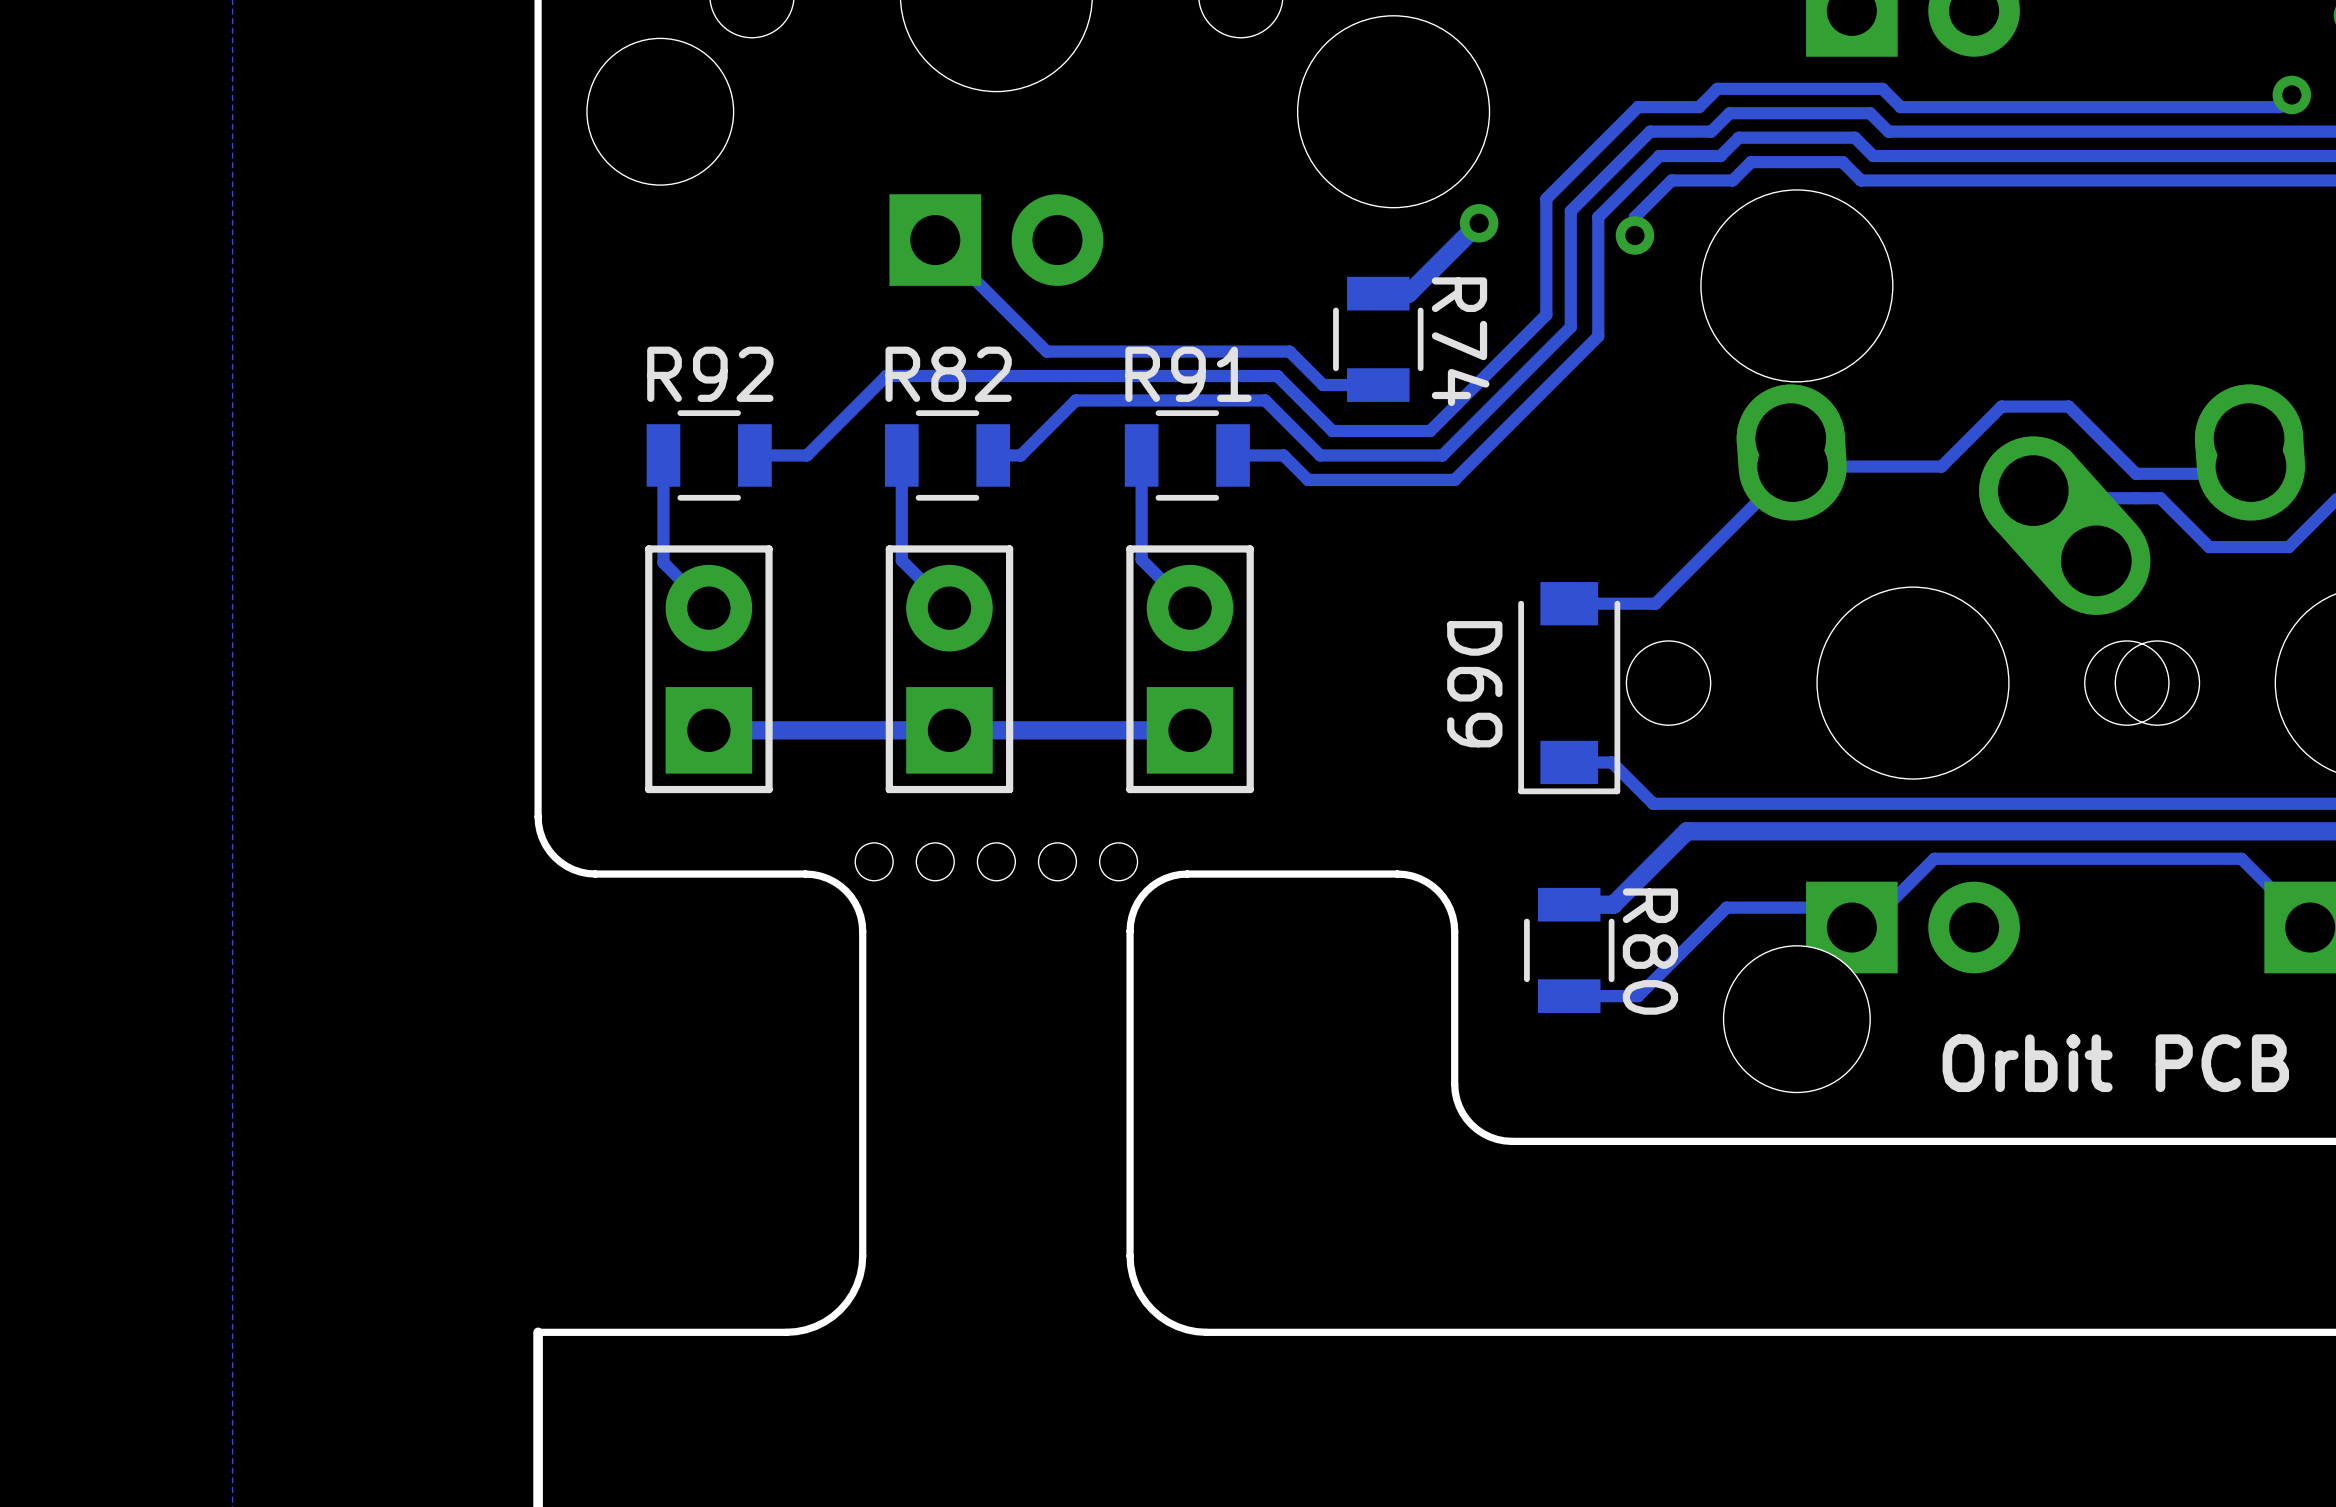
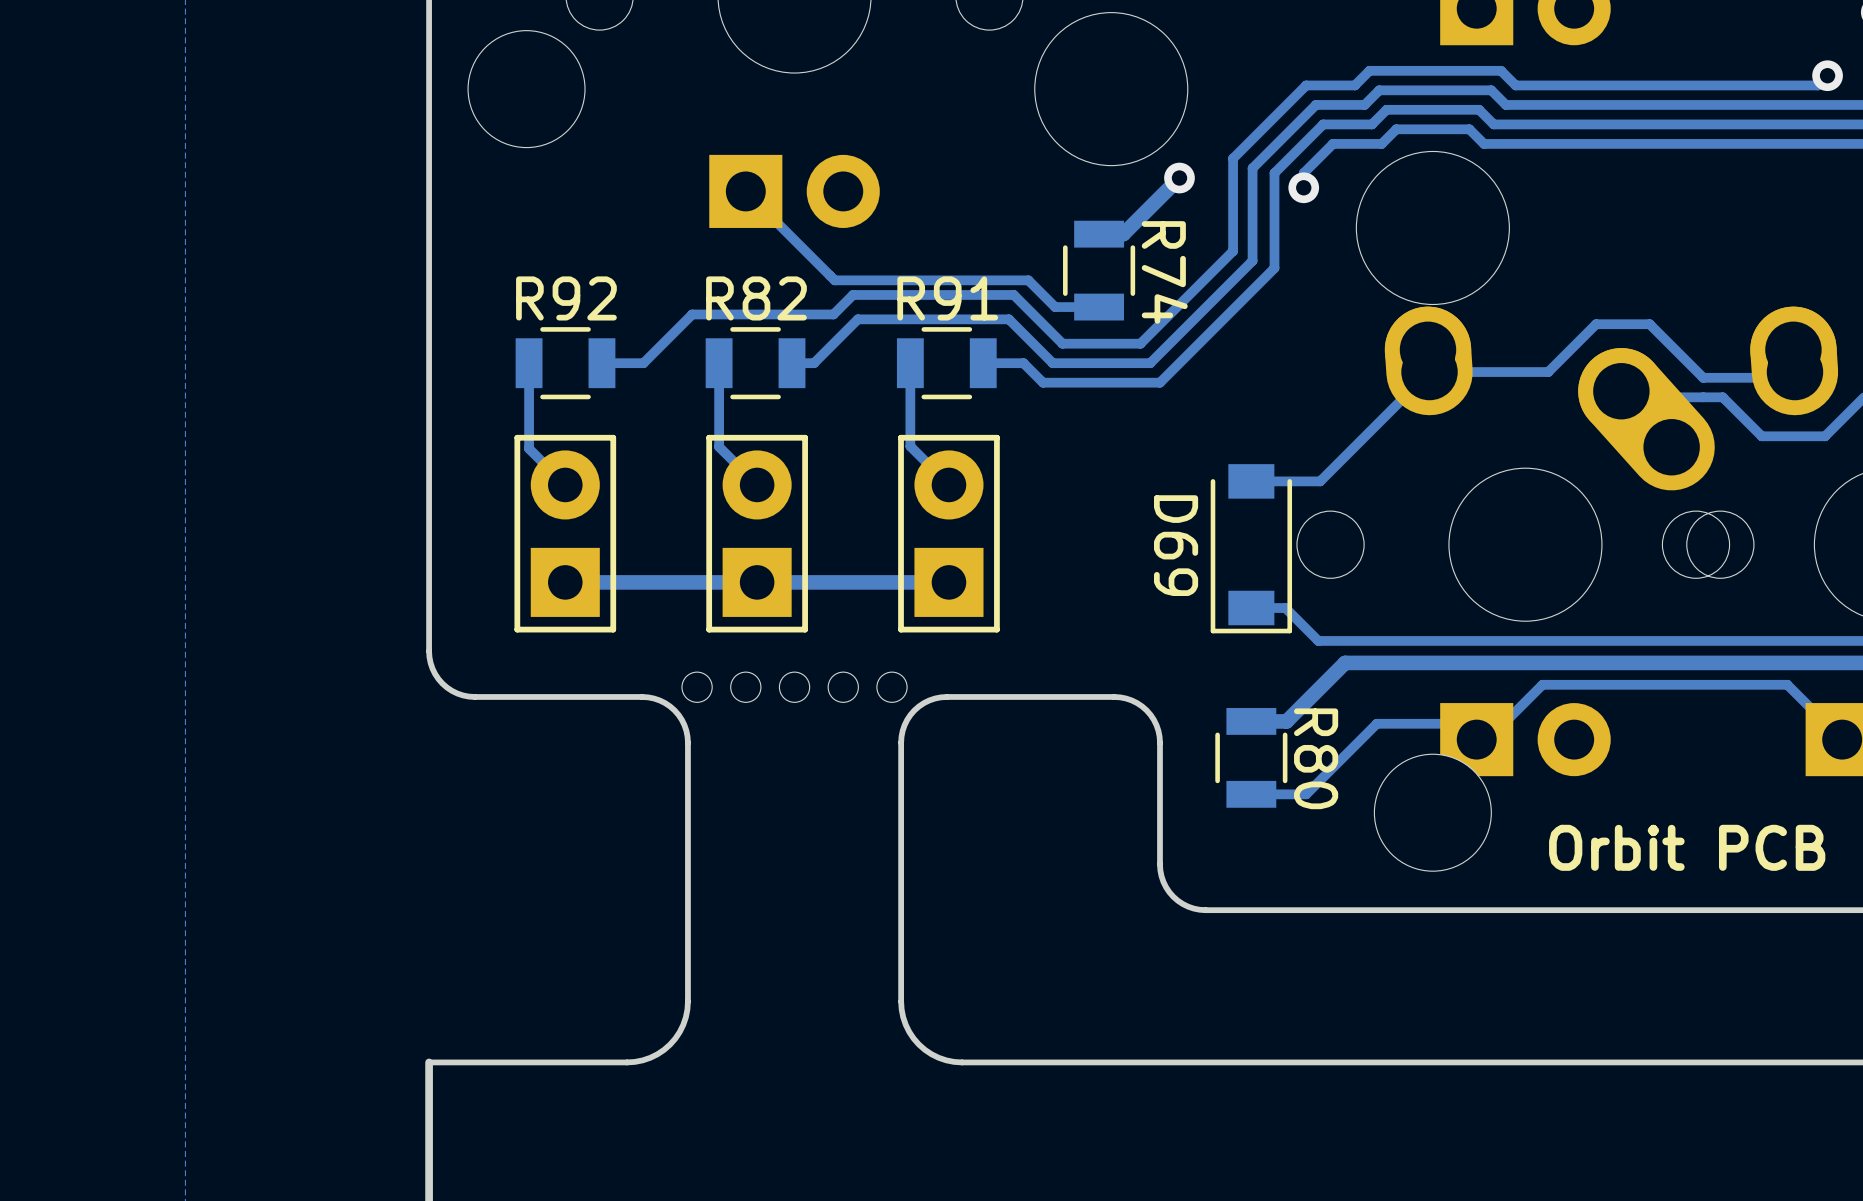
track: (1277, 376) (886, 376) (868, 394) -> (1018, 299) (1013, 294) (853, 294) (833, 314) (692, 314)

